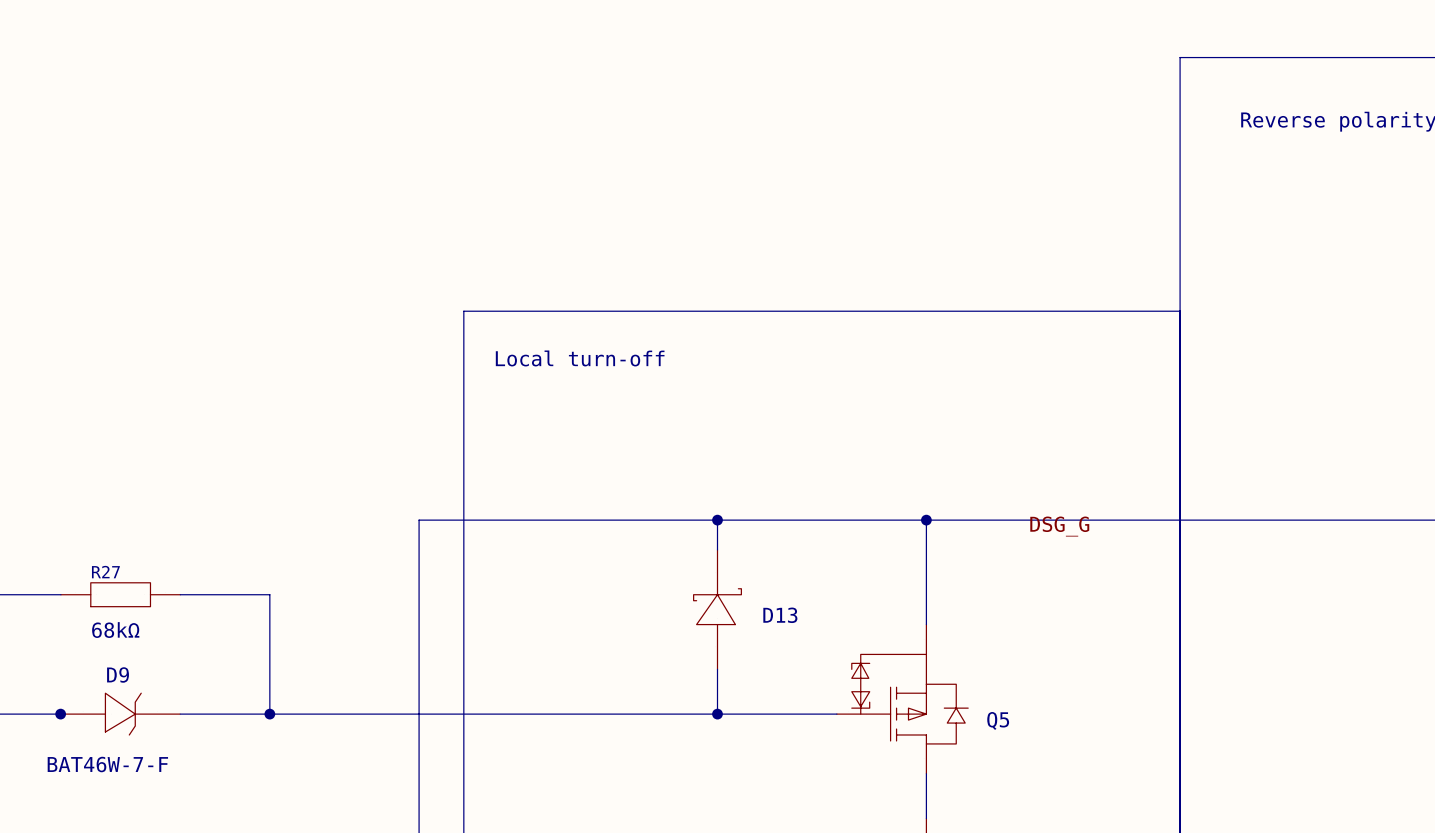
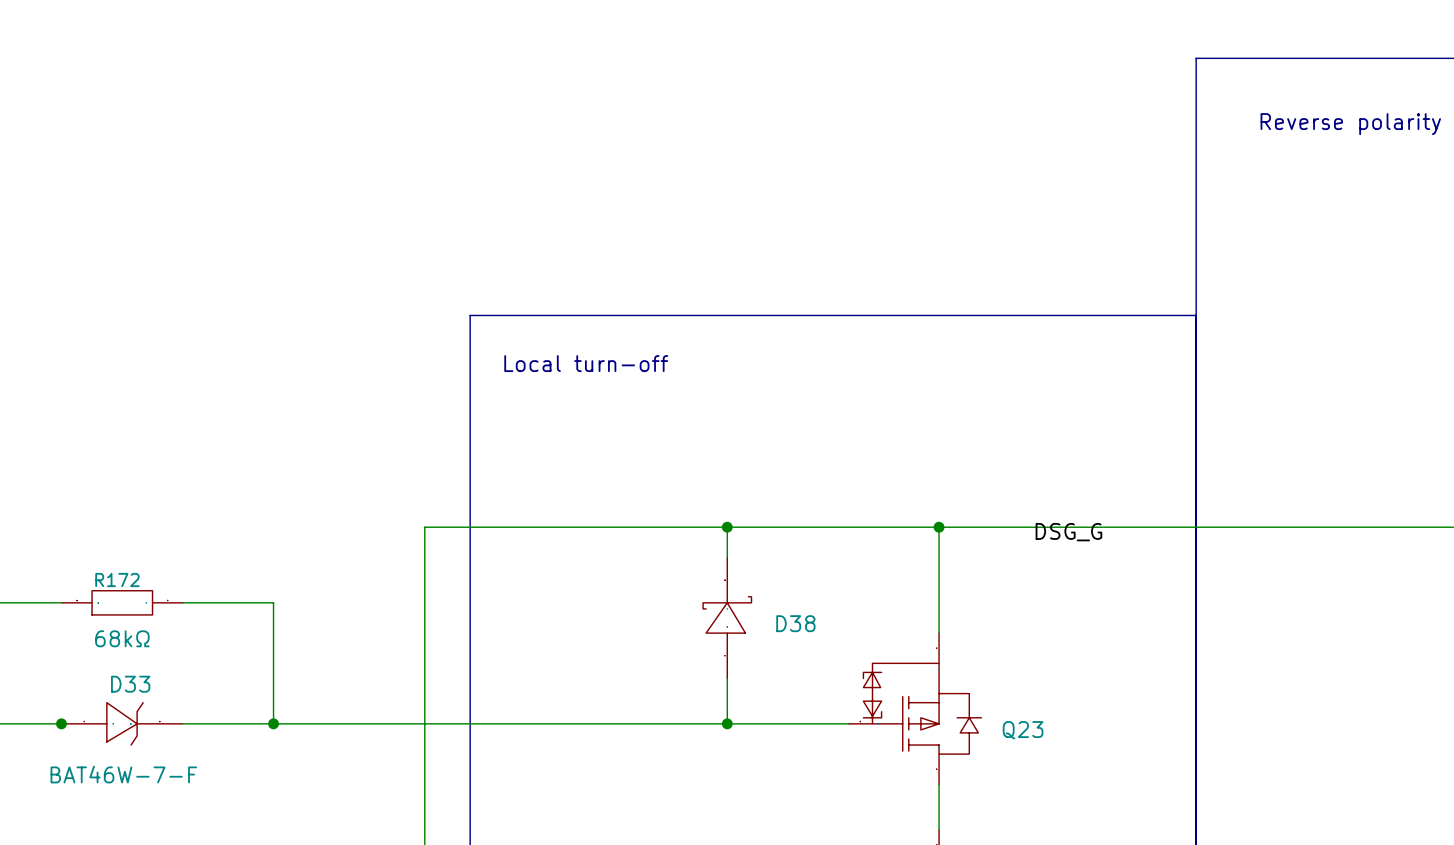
R27 name: R27 (105, 572) -> R172 (117, 580)
D13 name: D13 (780, 615) -> D38 (795, 623)
D9 name: D9 (118, 674) -> D33 (130, 684)
Q5 name: Q5 (998, 720) -> Q23 (1023, 730)

